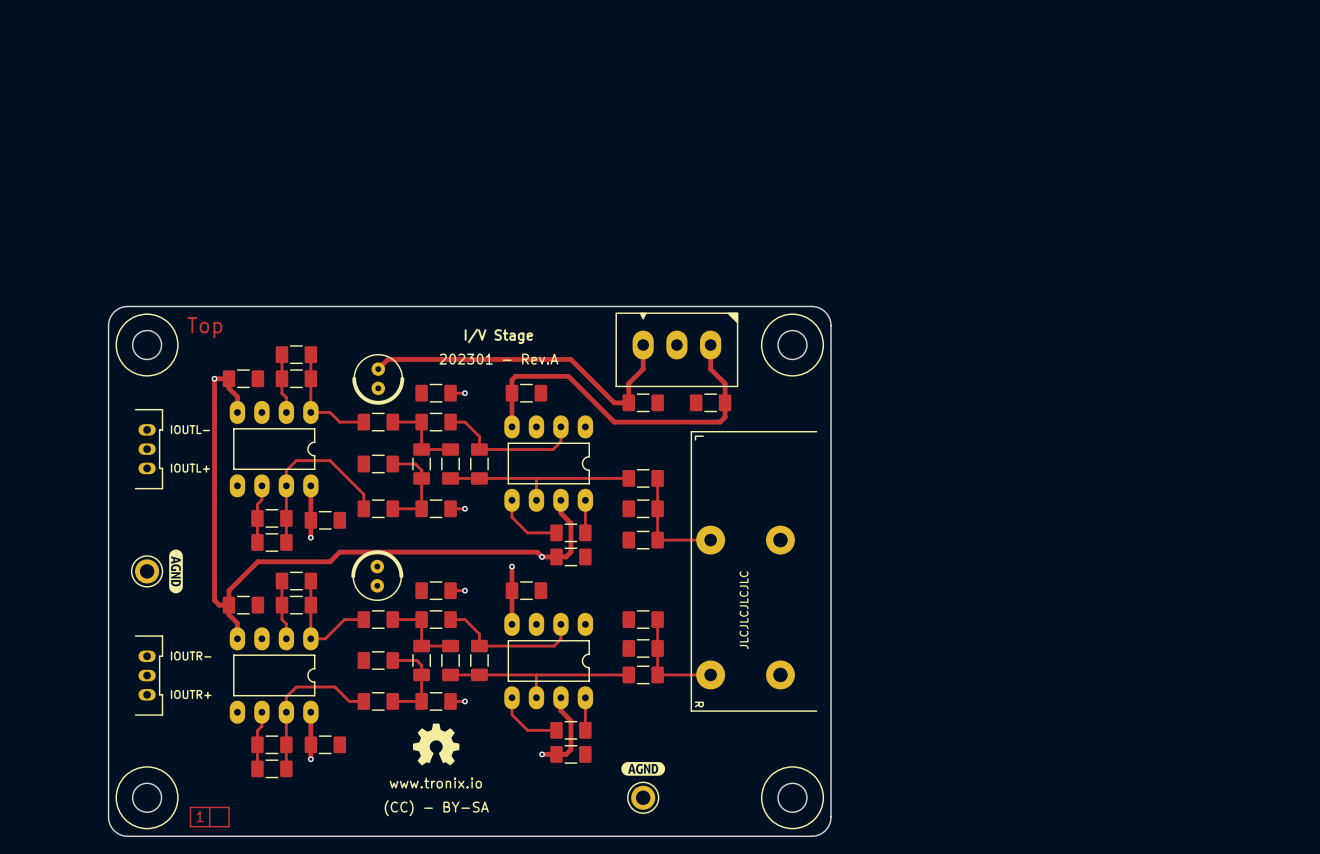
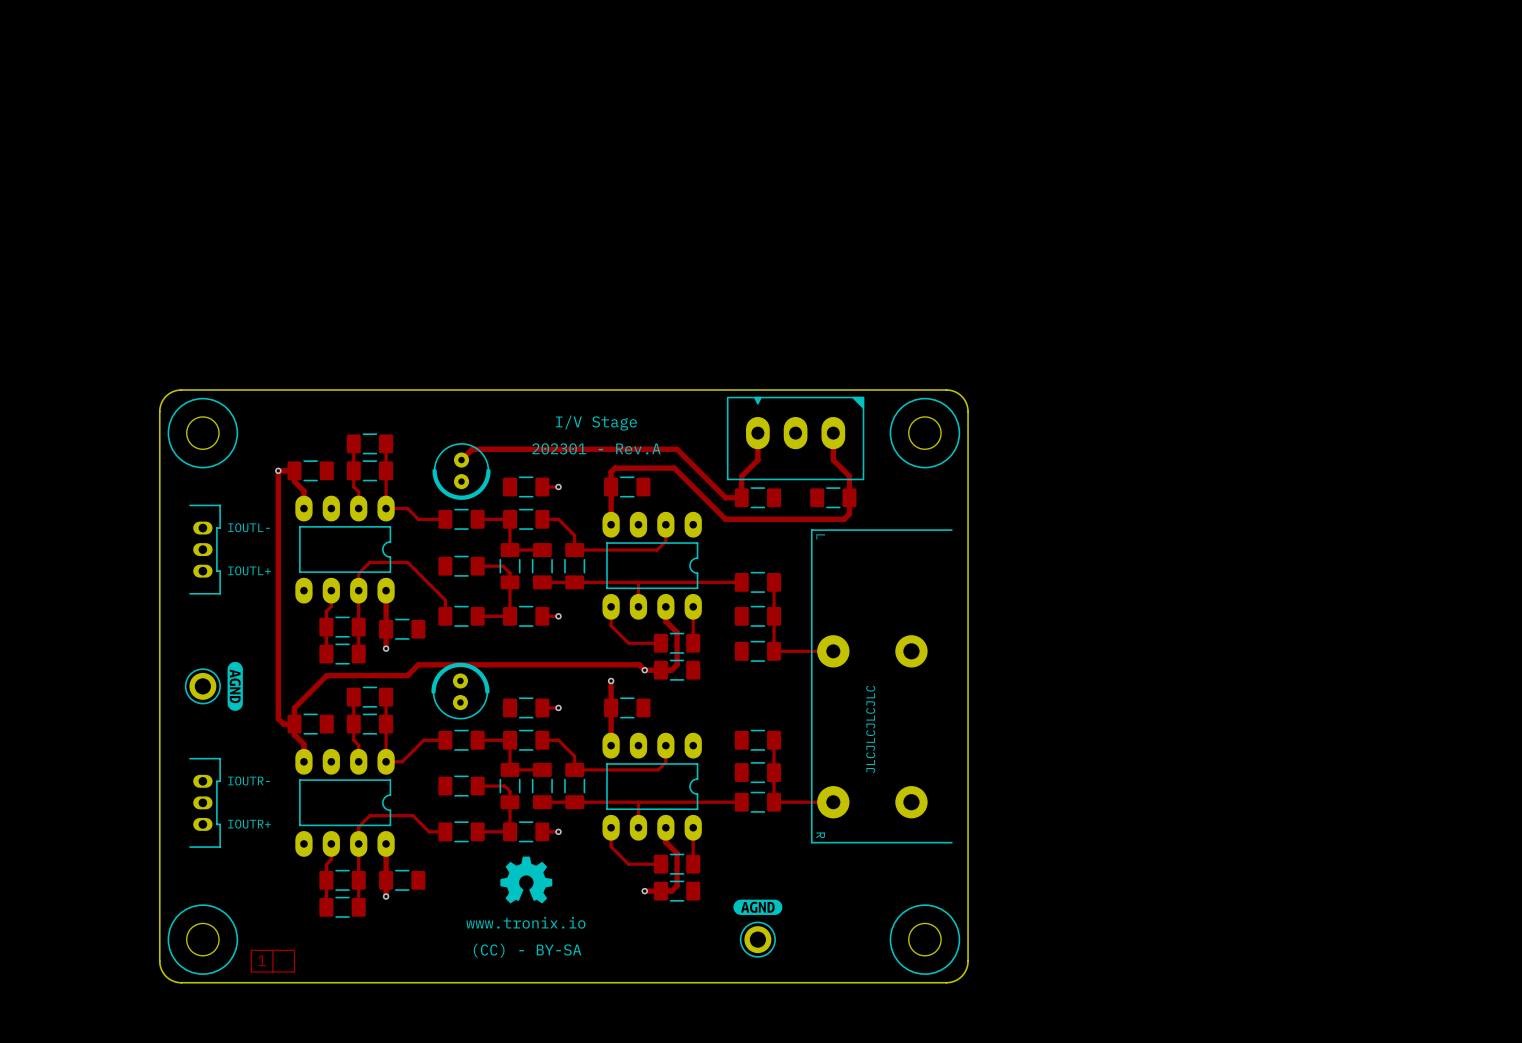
text: Top (204, 327) -> none

